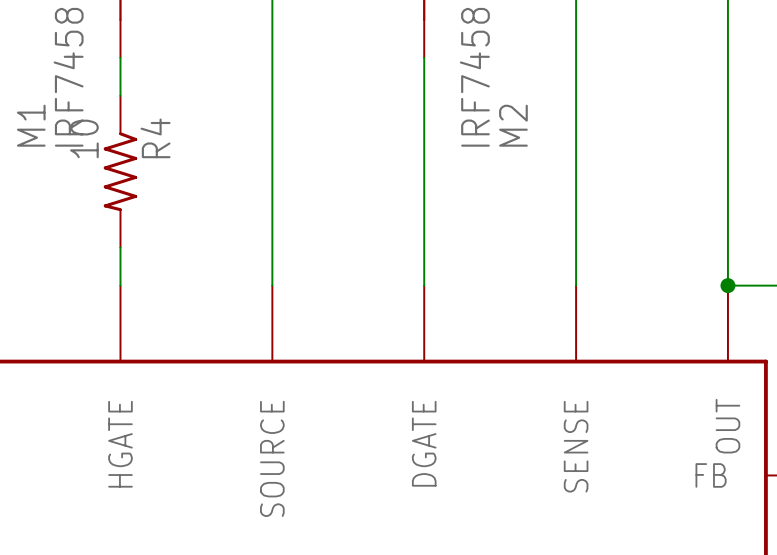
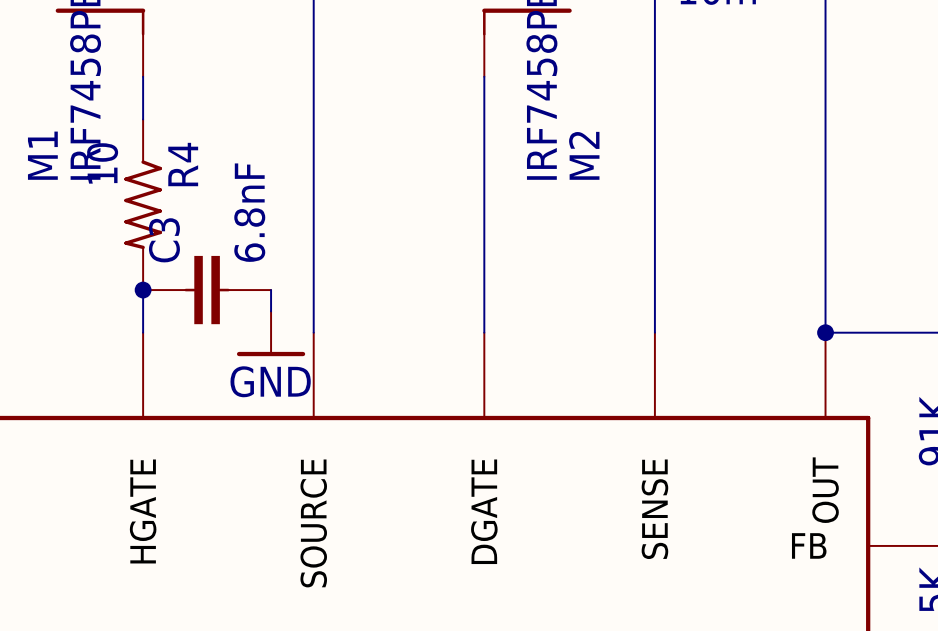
junction: none -> (143, 290)
C3: none -> 6.8nF (207, 290)
wire: none -> (271, 290) (271, 311)
power symbol: none -> GND (271, 333)

